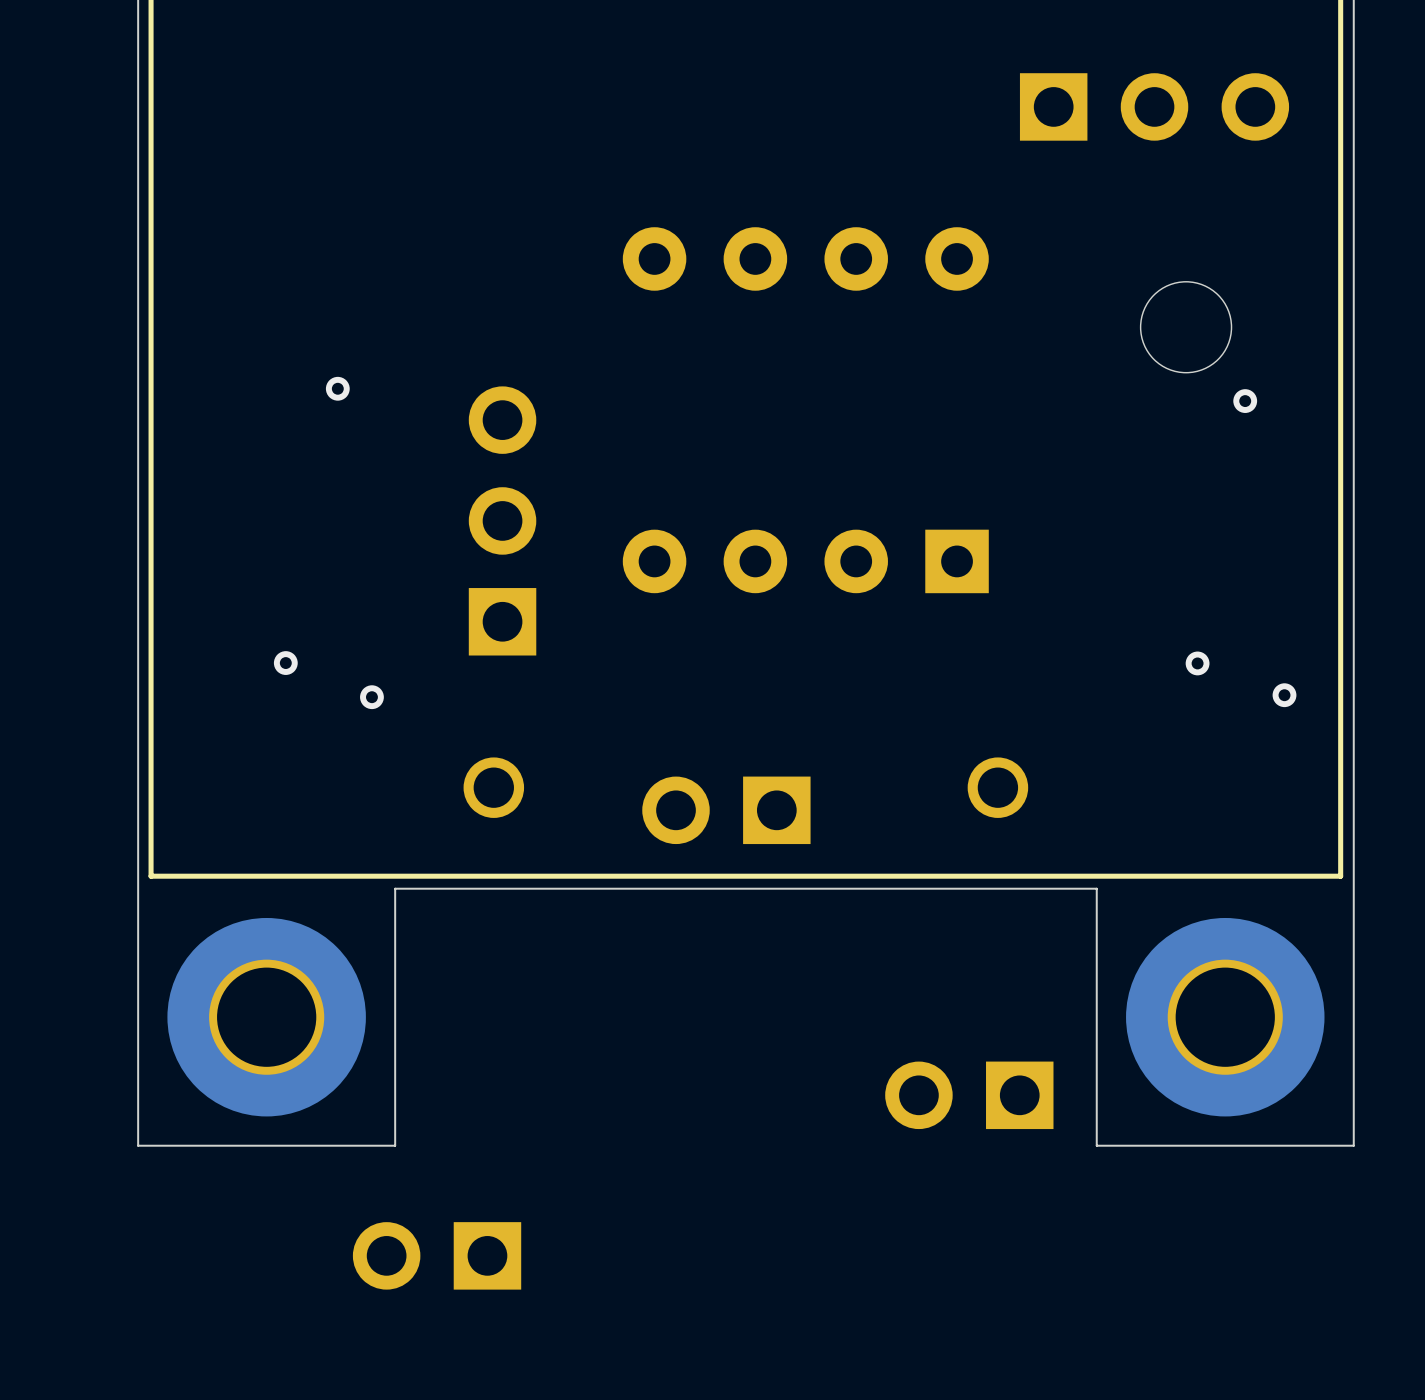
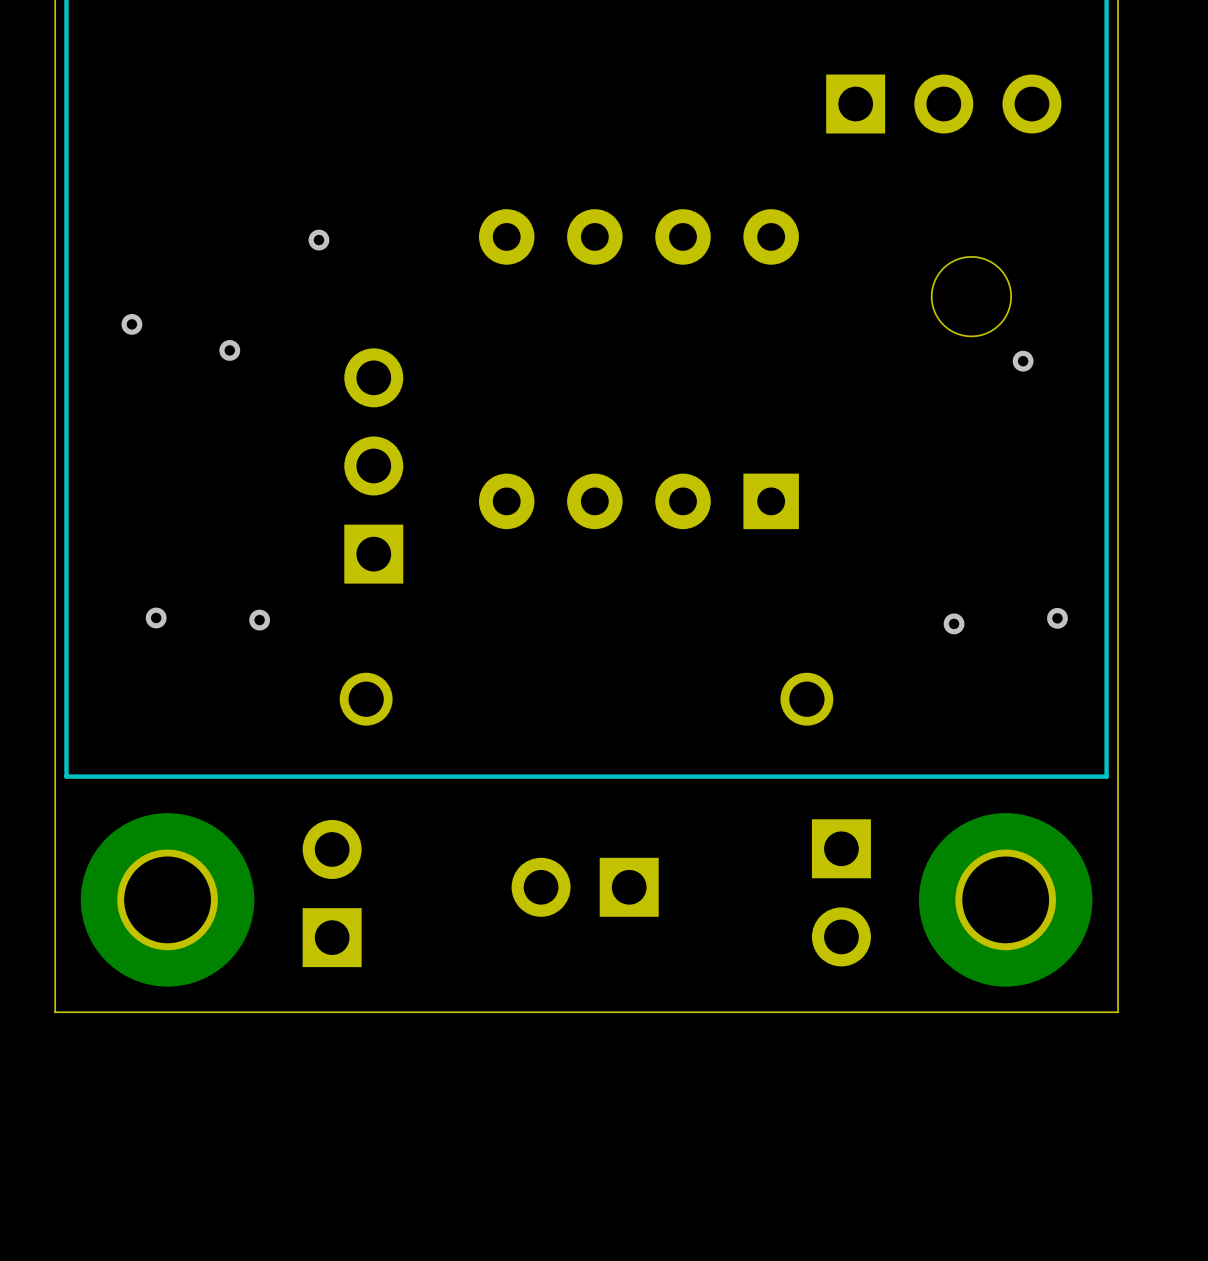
via: none -> (318, 240)
via: none -> (131, 324)
via position: (285, 663) -> (156, 617)
via position: (1197, 663) -> (954, 623)
part: (726, 810) -> none
part: none -> (585, 887)
part: none -> (332, 893)
part rotation: 0° (969, 1095) -> 90° counterclockwise (841, 892)
part position: (969, 1095) -> (841, 892)
board edge: (1096, 1145) (1096, 888) (395, 888) (395, 1145) -> (893, 1012) (279, 1012)
part: (437, 1255) -> none

